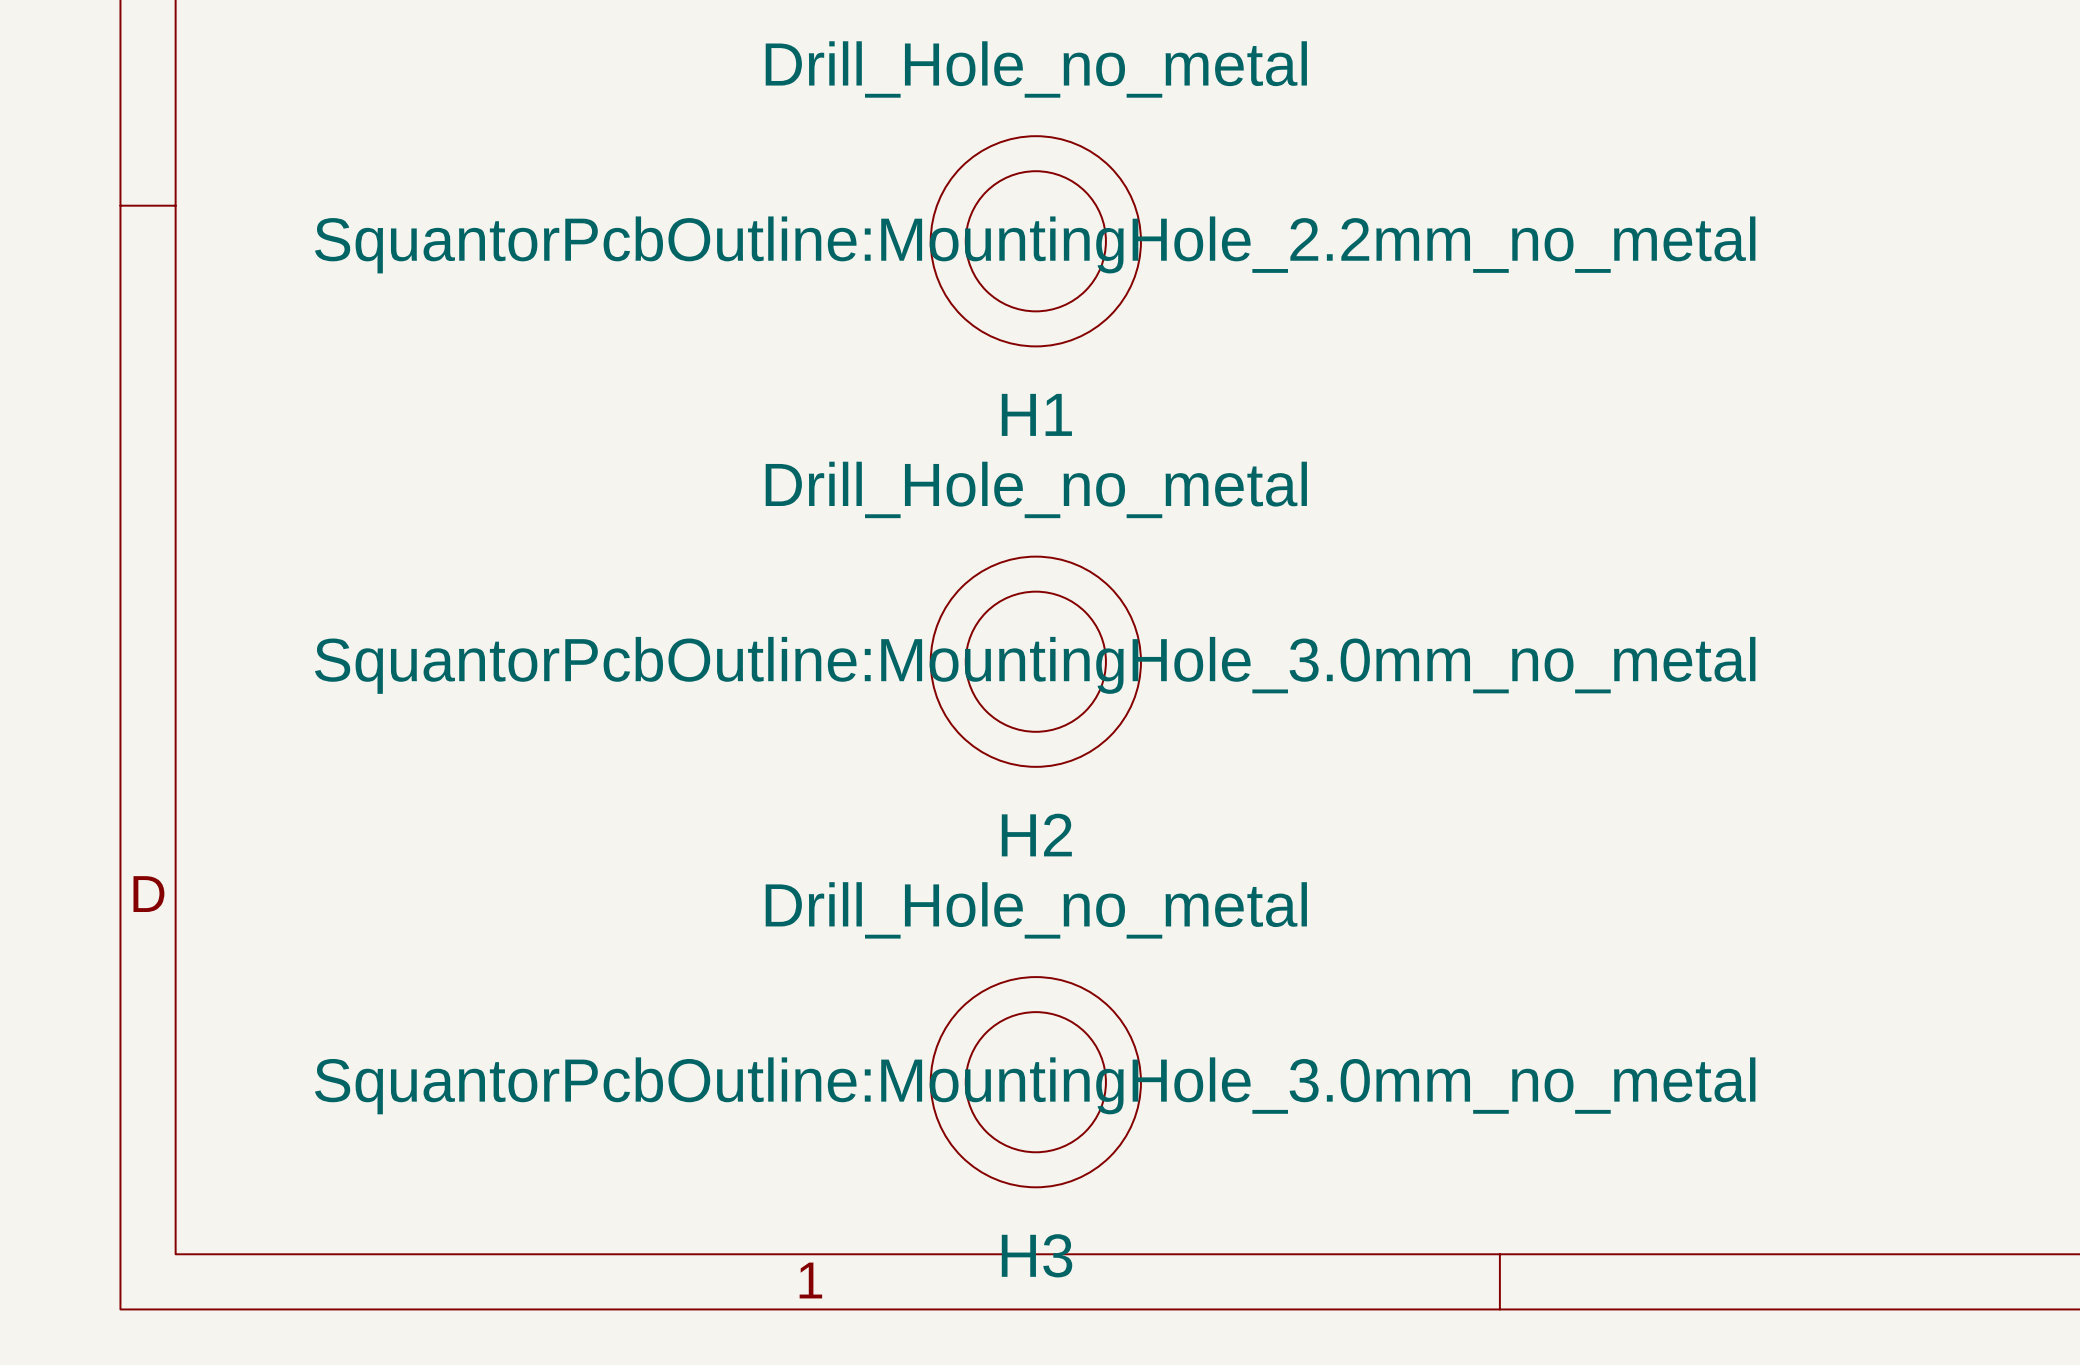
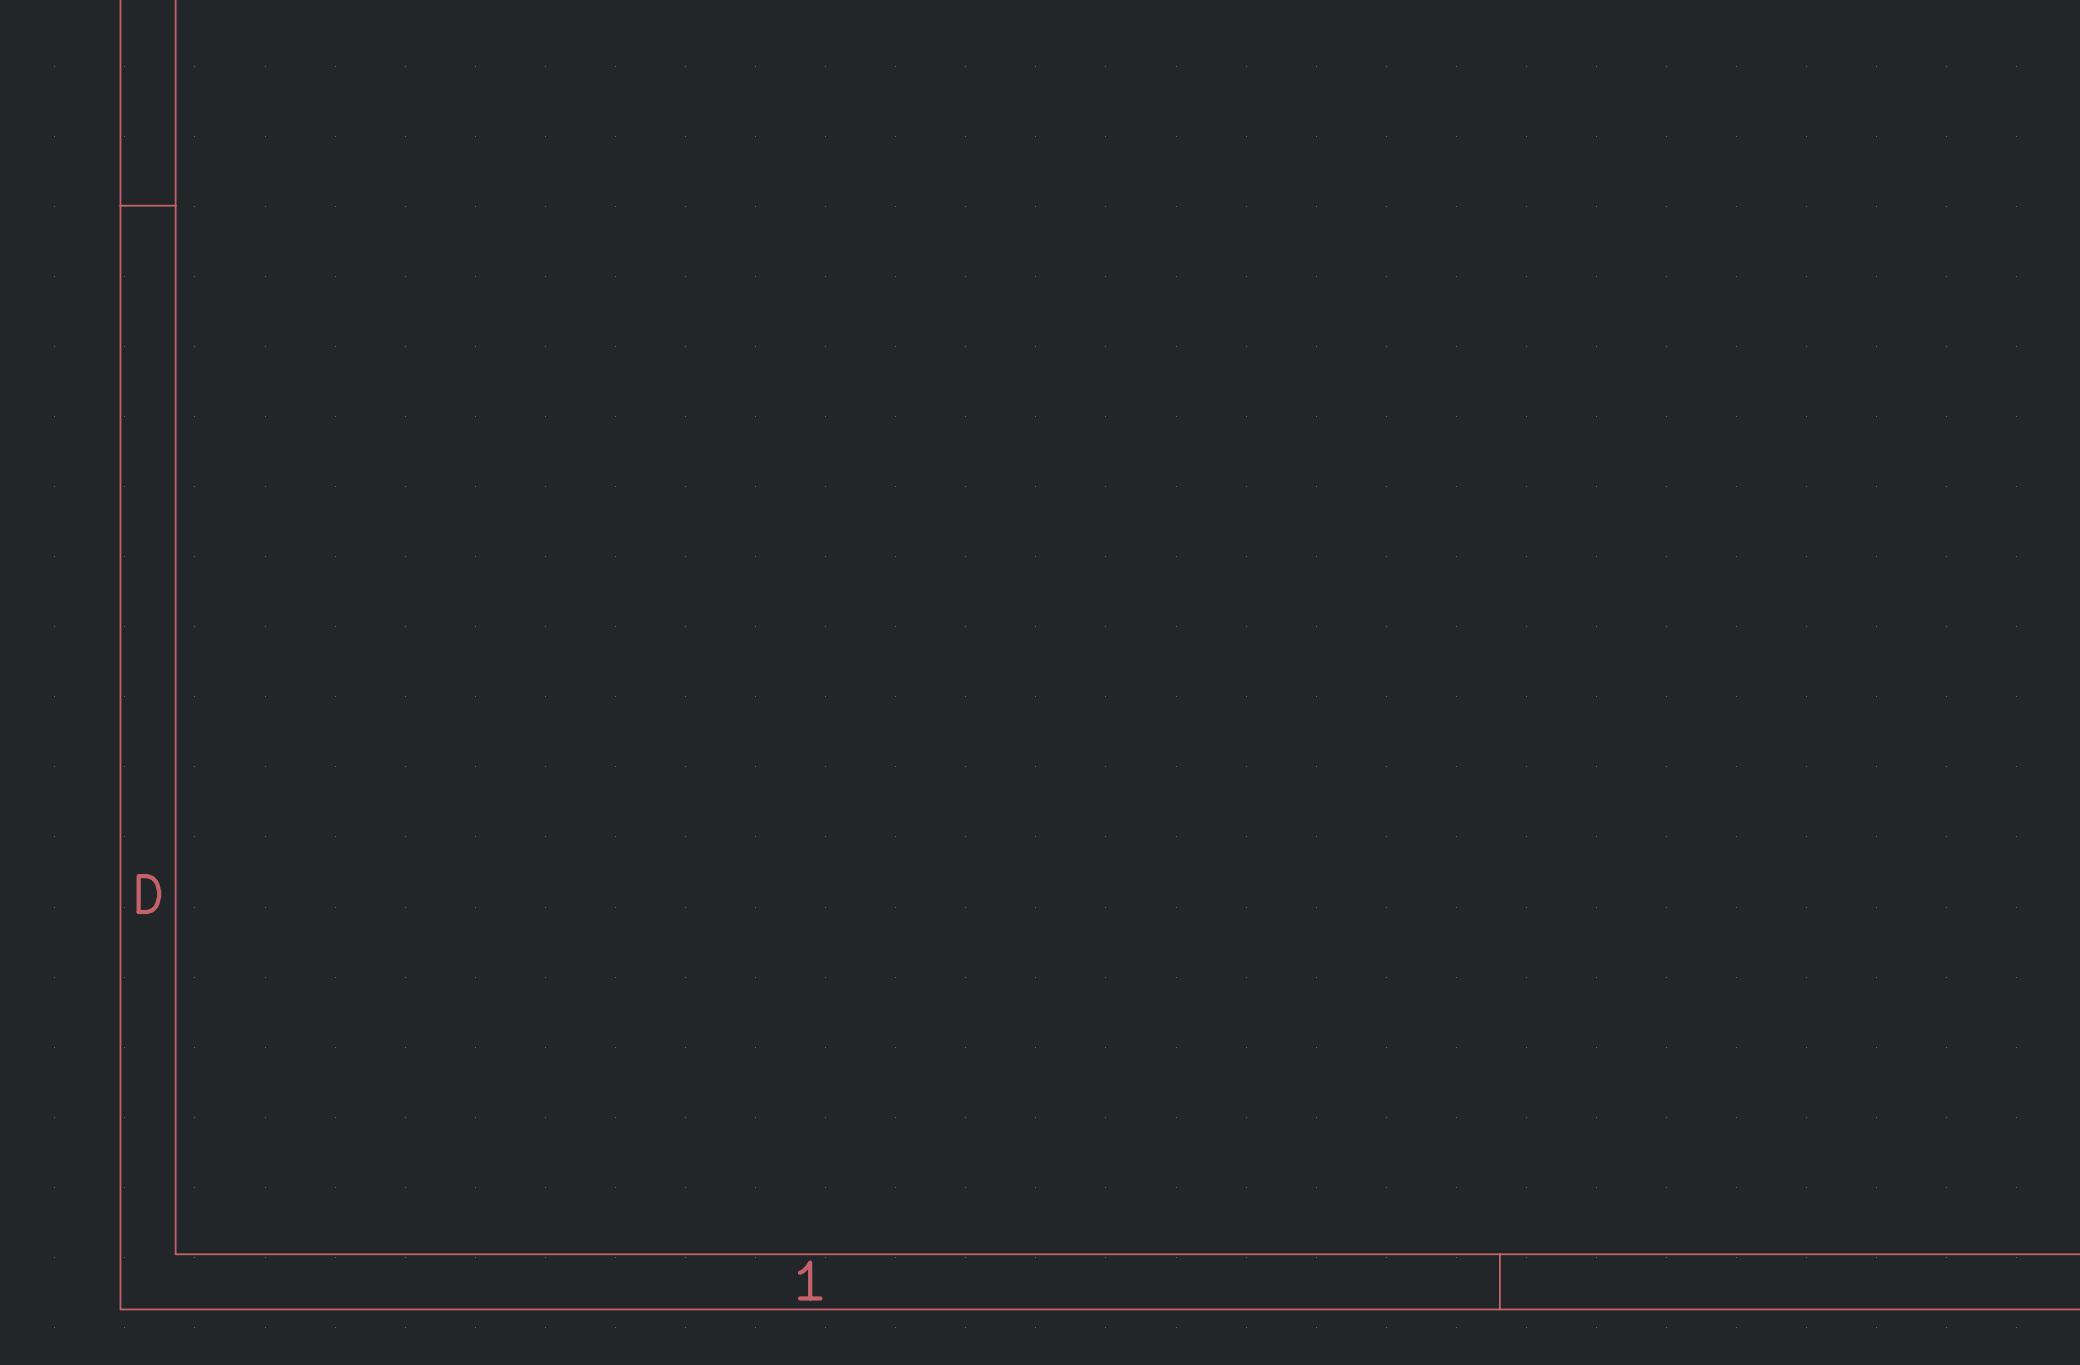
H1: Drill_Hole_no_metal (1035, 241) -> none
H2: Drill_Hole_no_metal (1035, 661) -> none
H3: Drill_Hole_no_metal (1035, 1082) -> none

